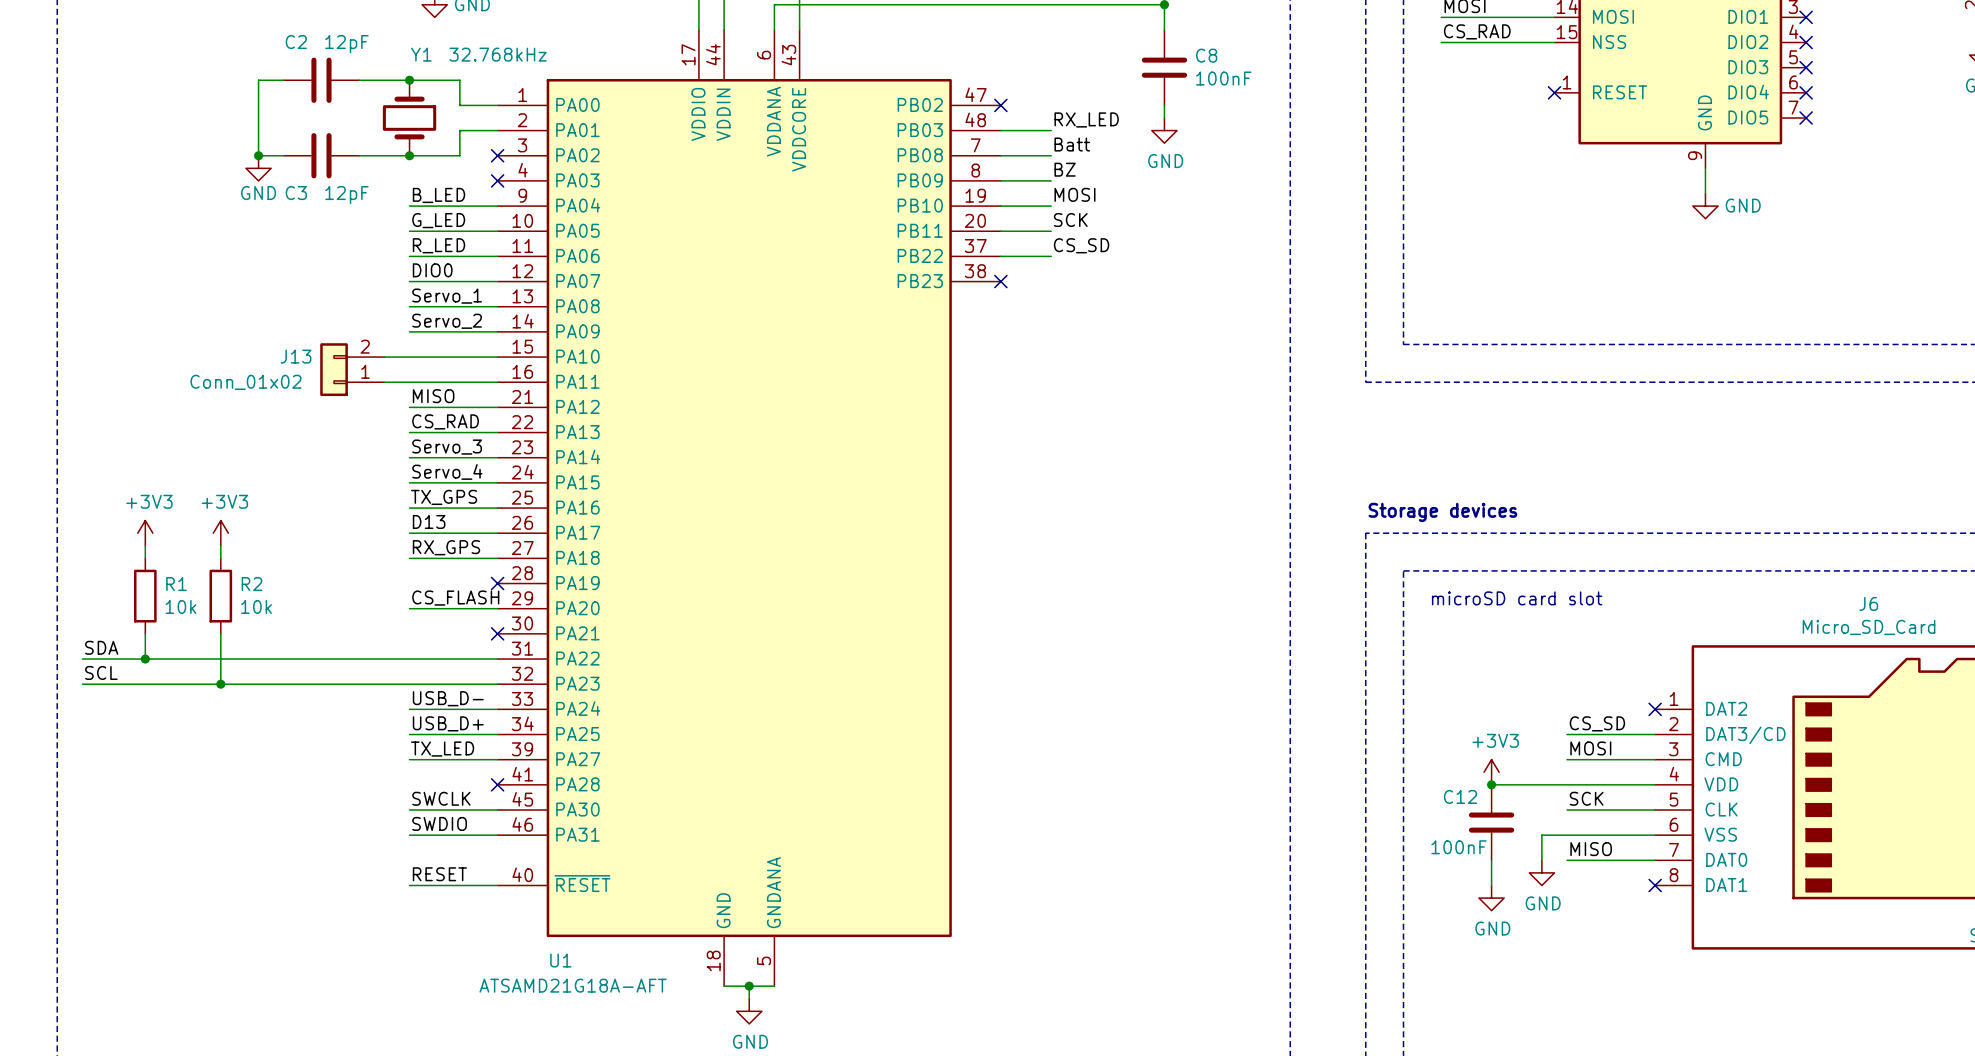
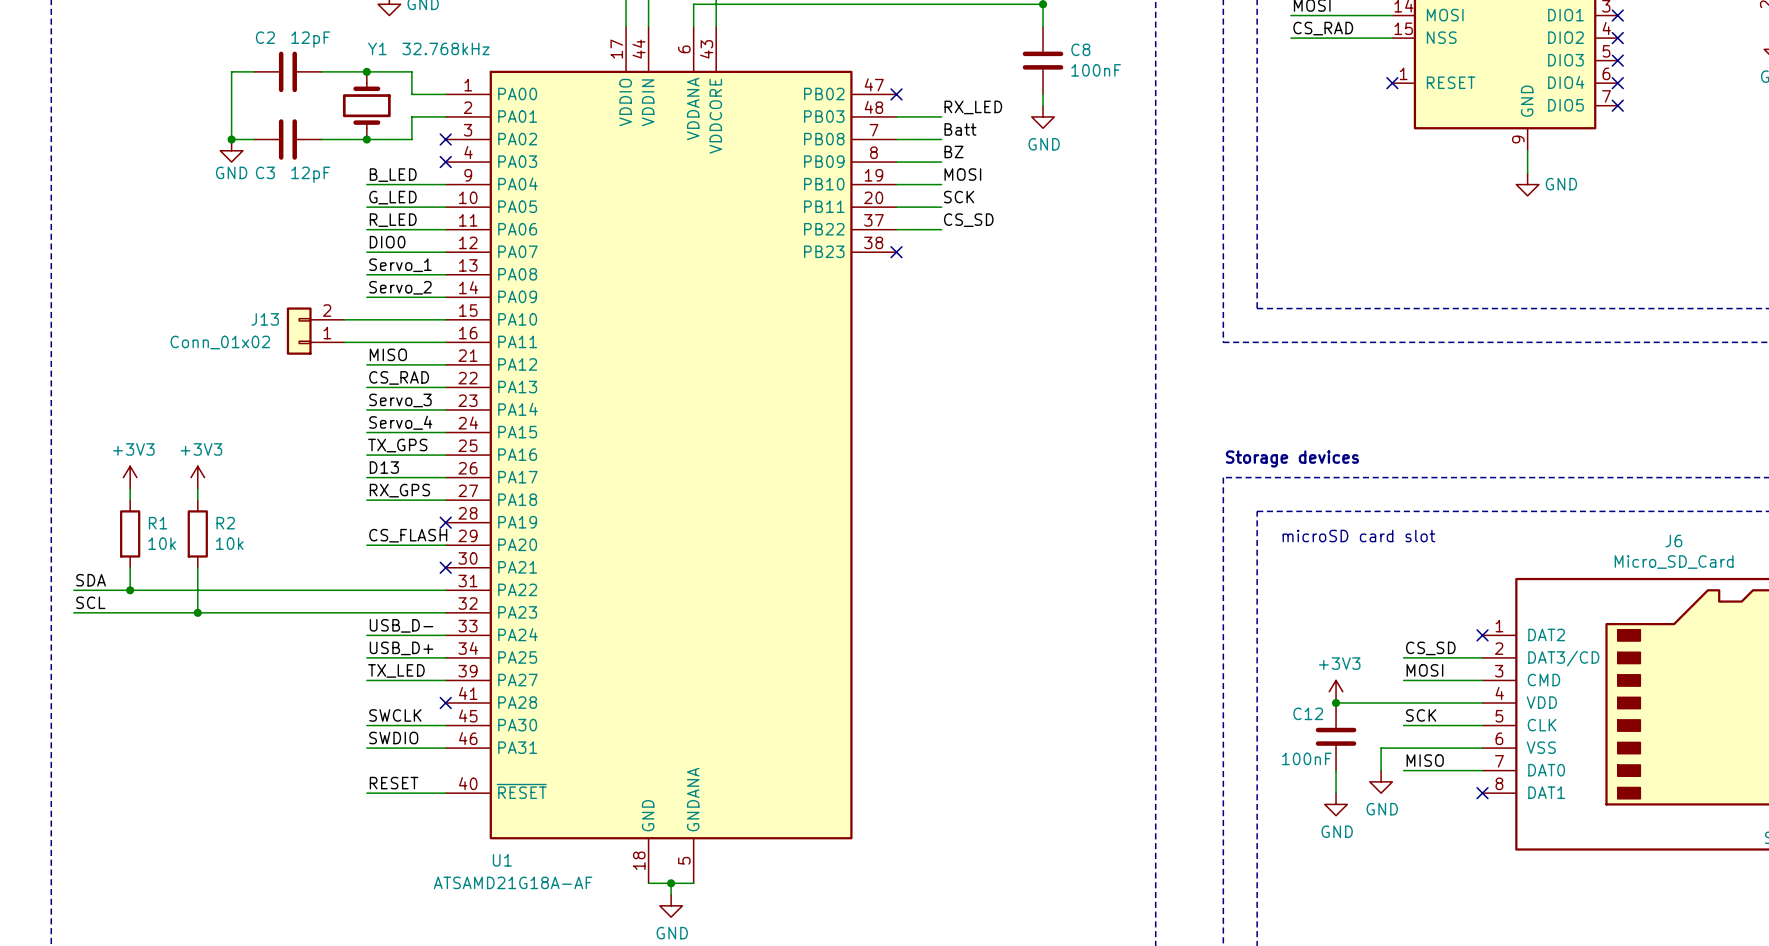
U1 value: ATSAMD21G18A-AFT (573, 985) -> ATSAMD21G18A-AF (513, 882)

